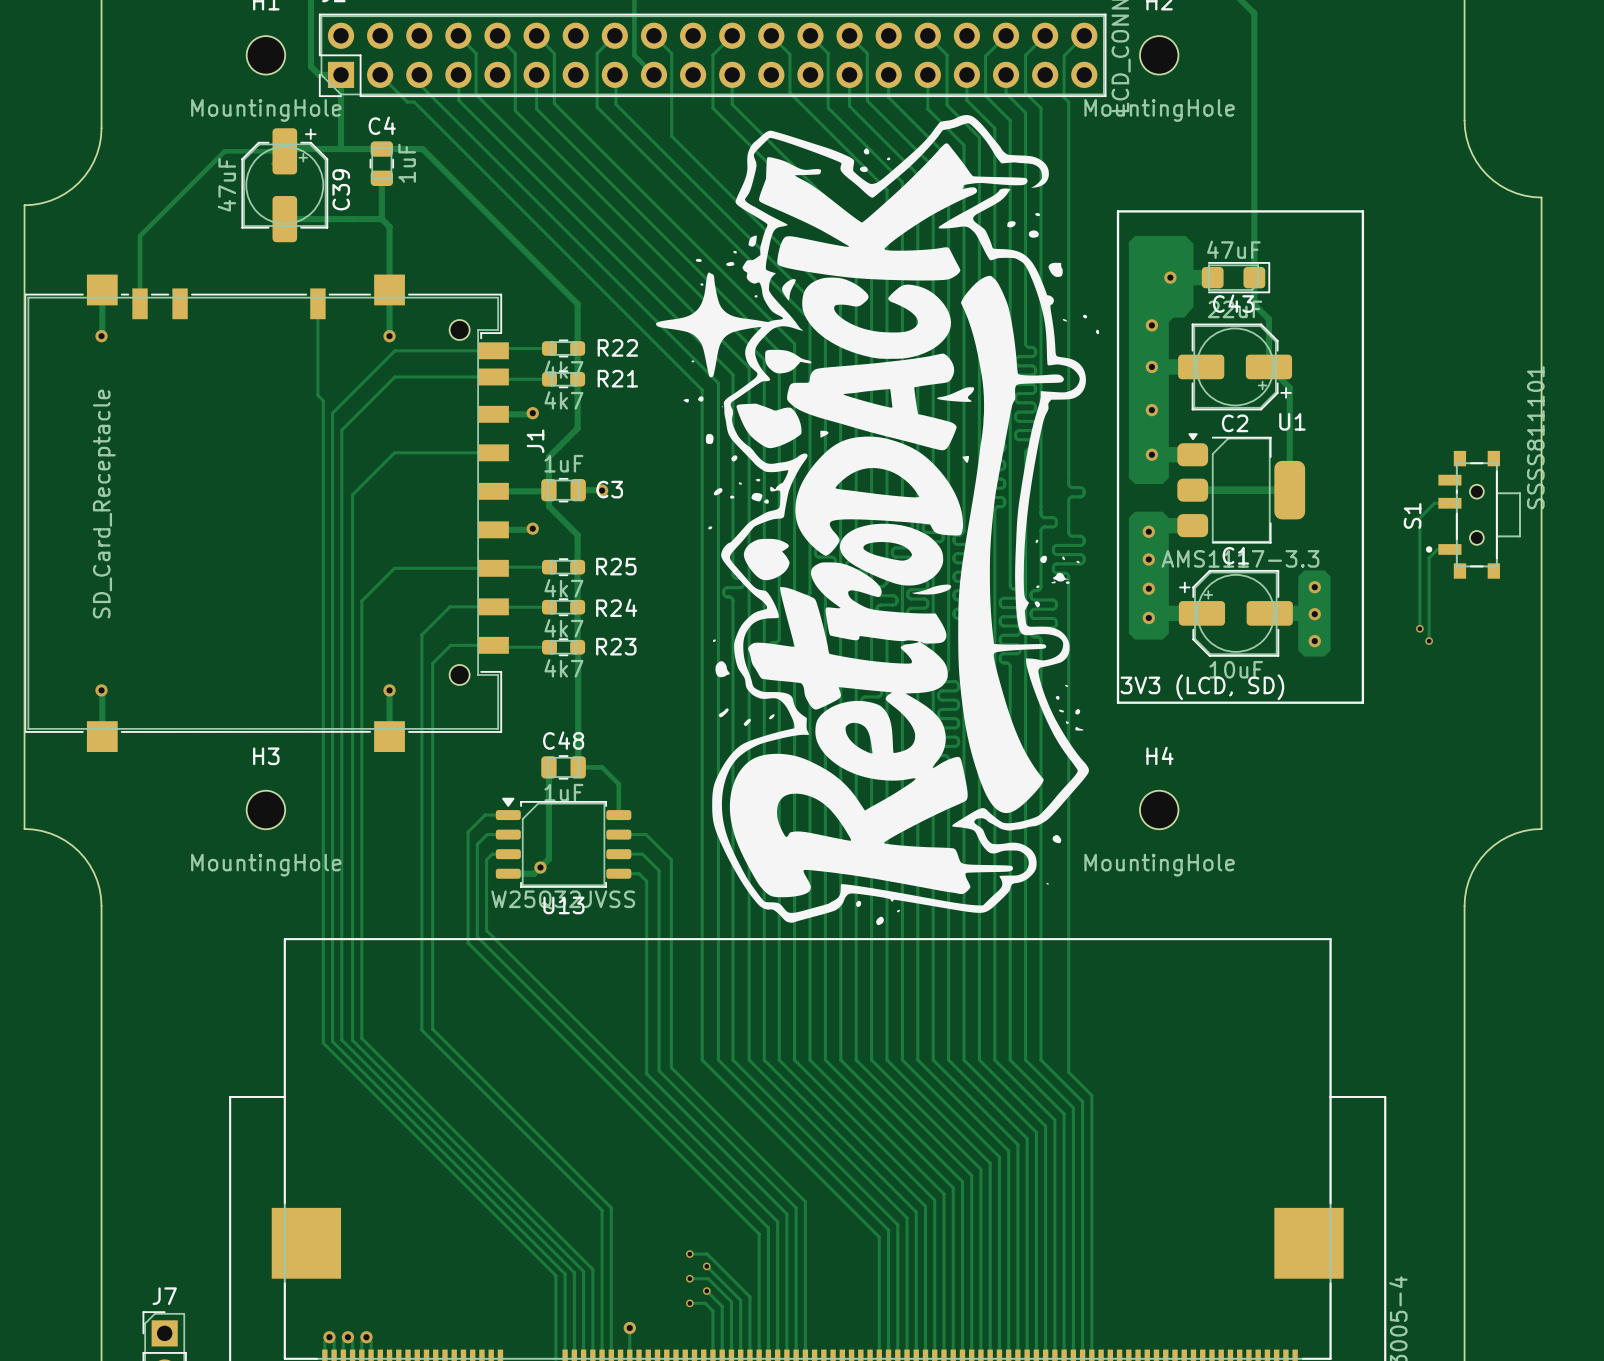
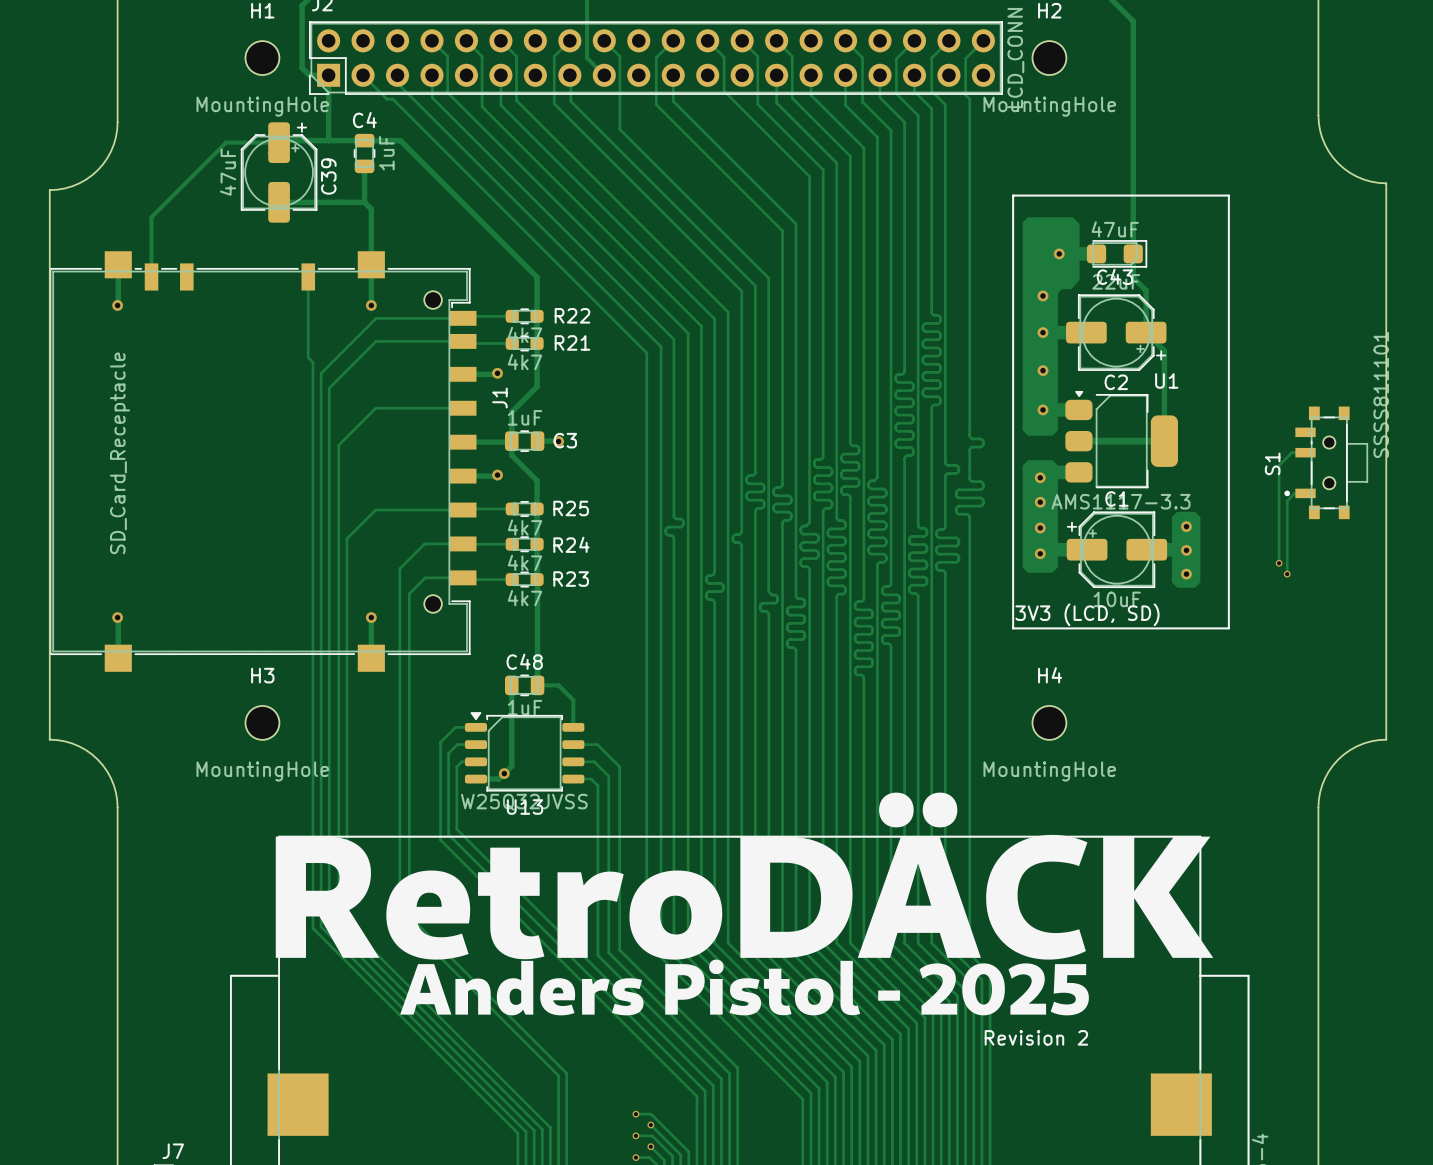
drawing: [655, 115, 1100, 926] -> none
drawing: none -> [275, 792, 1214, 1016]
drawing: none -> [878, 990, 901, 1001]
text: none -> Revision 2 (1036, 1037)

